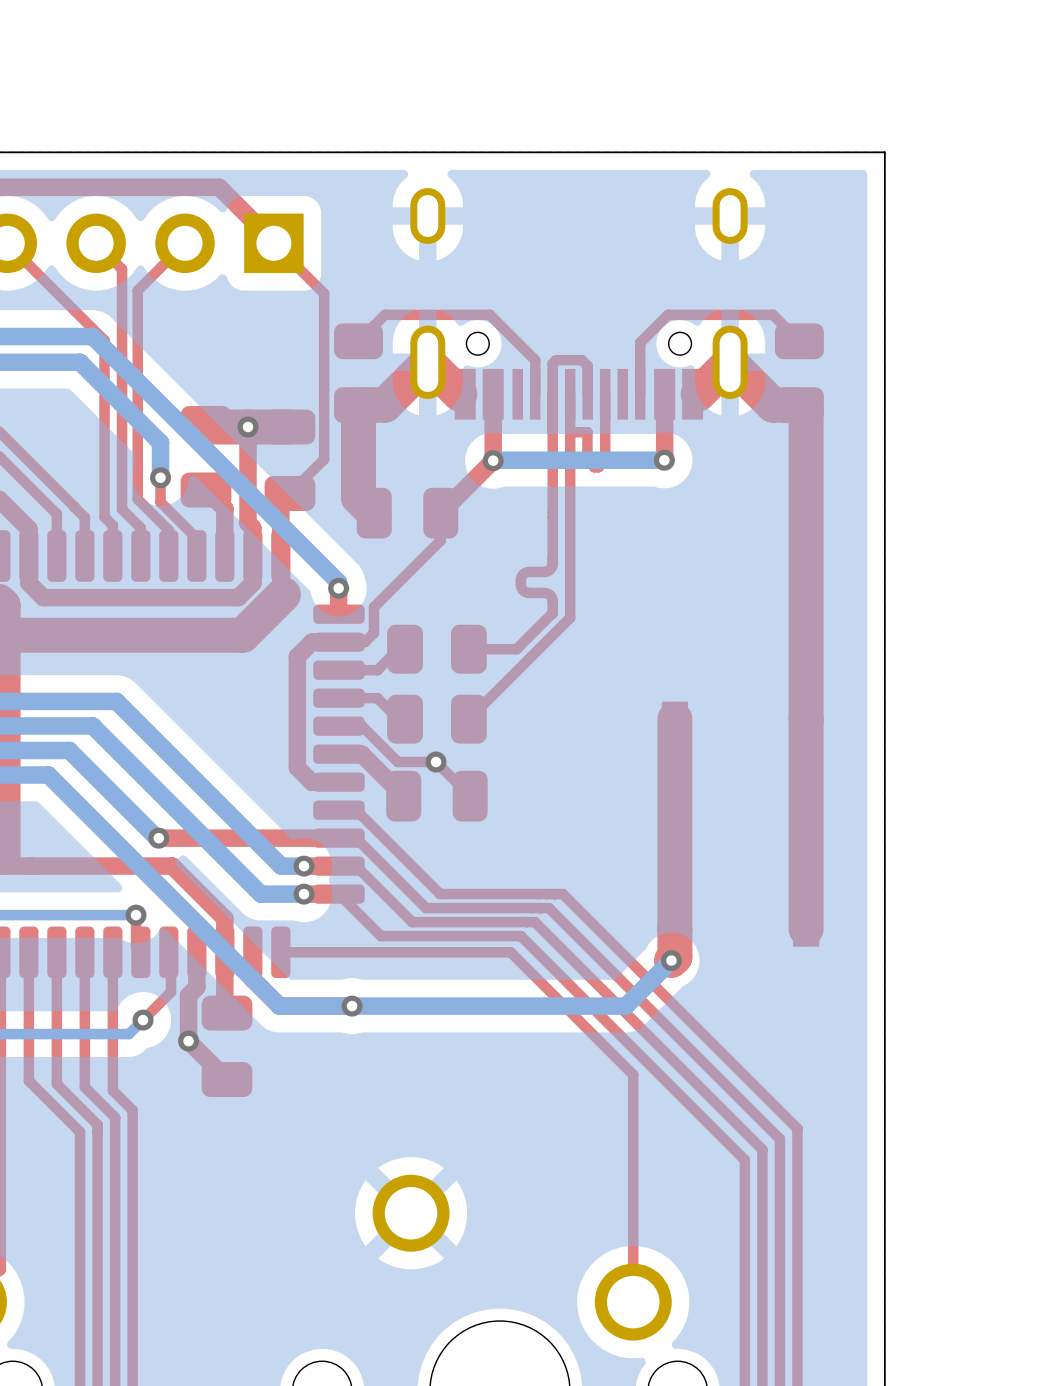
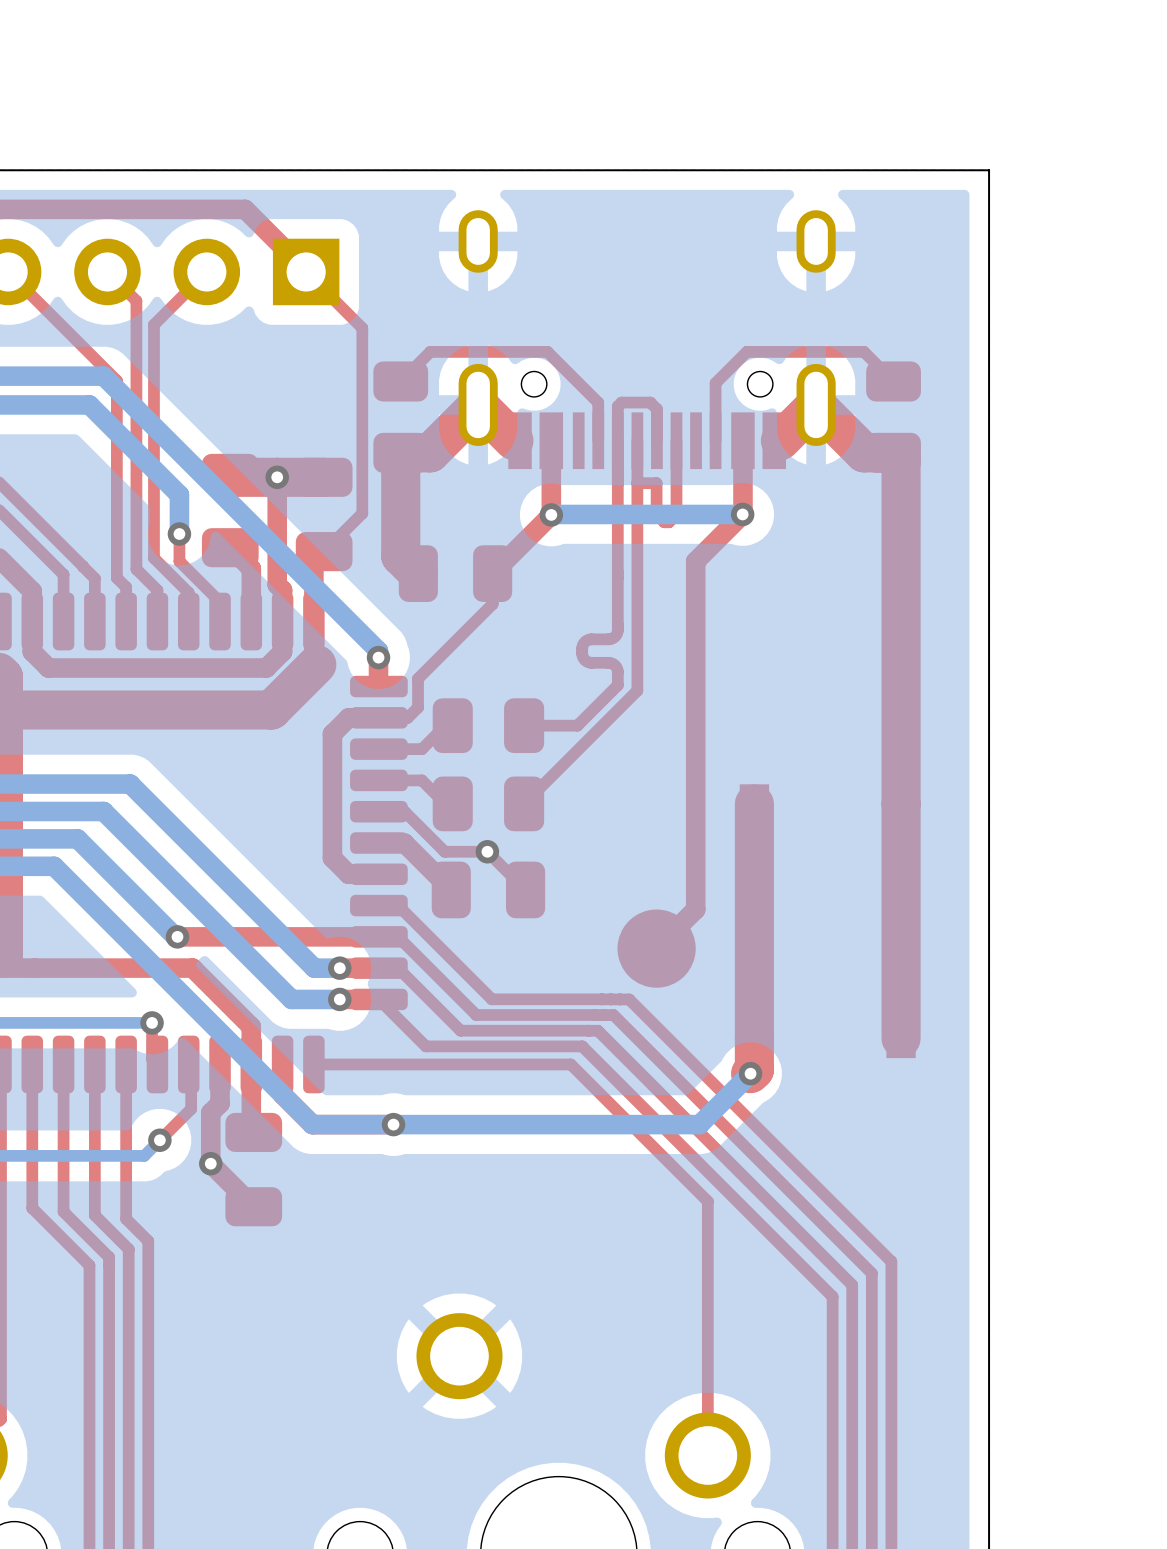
top track: none -> (742, 514) (695, 561) (695, 909) (656, 948)
part: none -> (656, 948)

